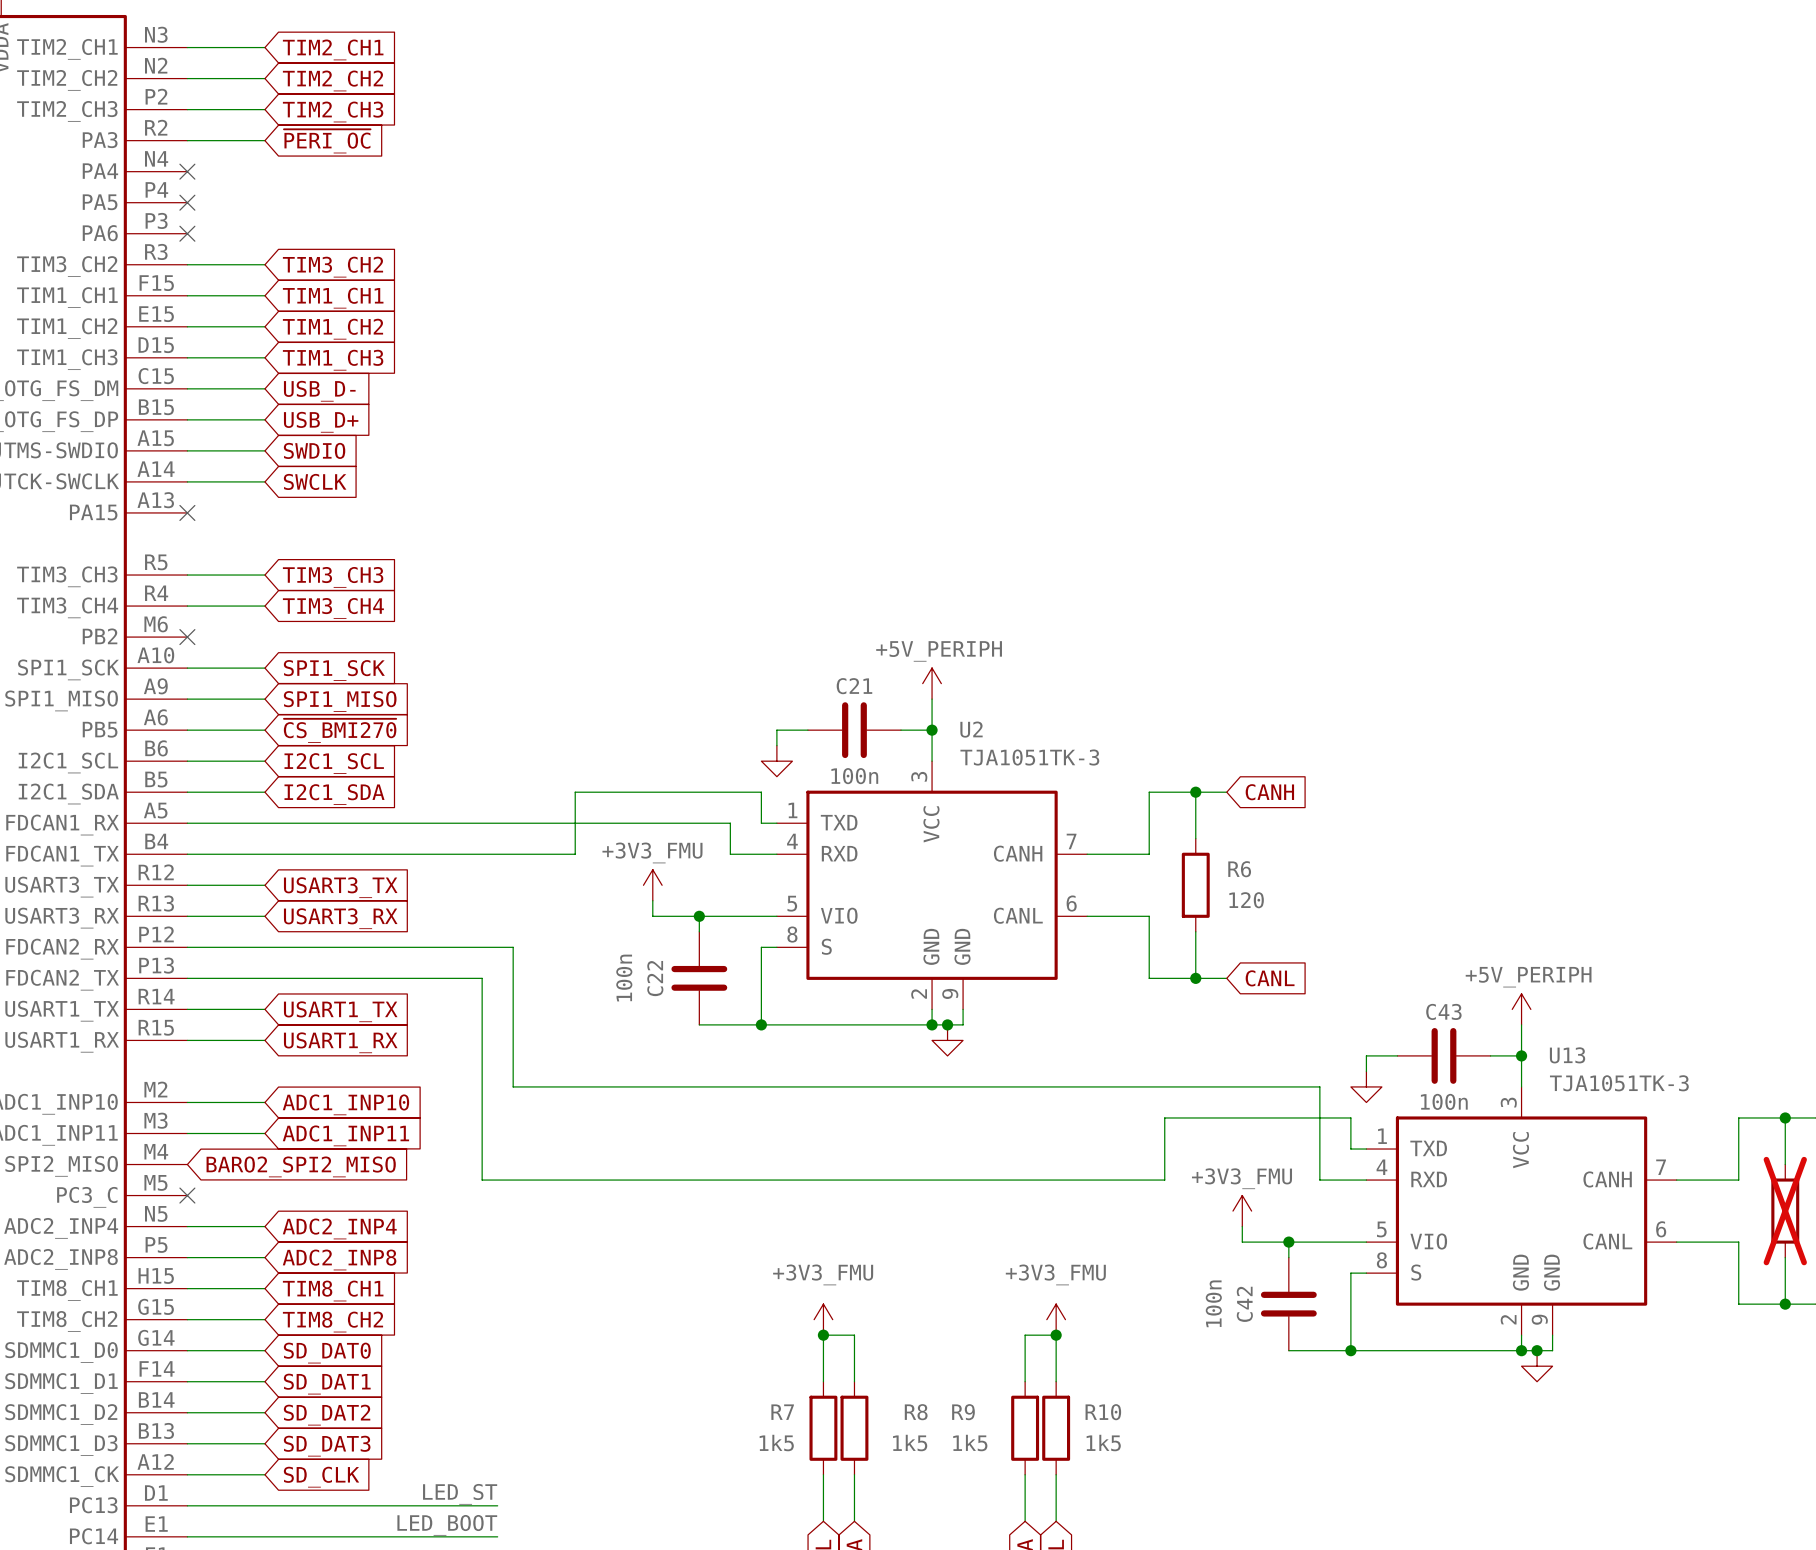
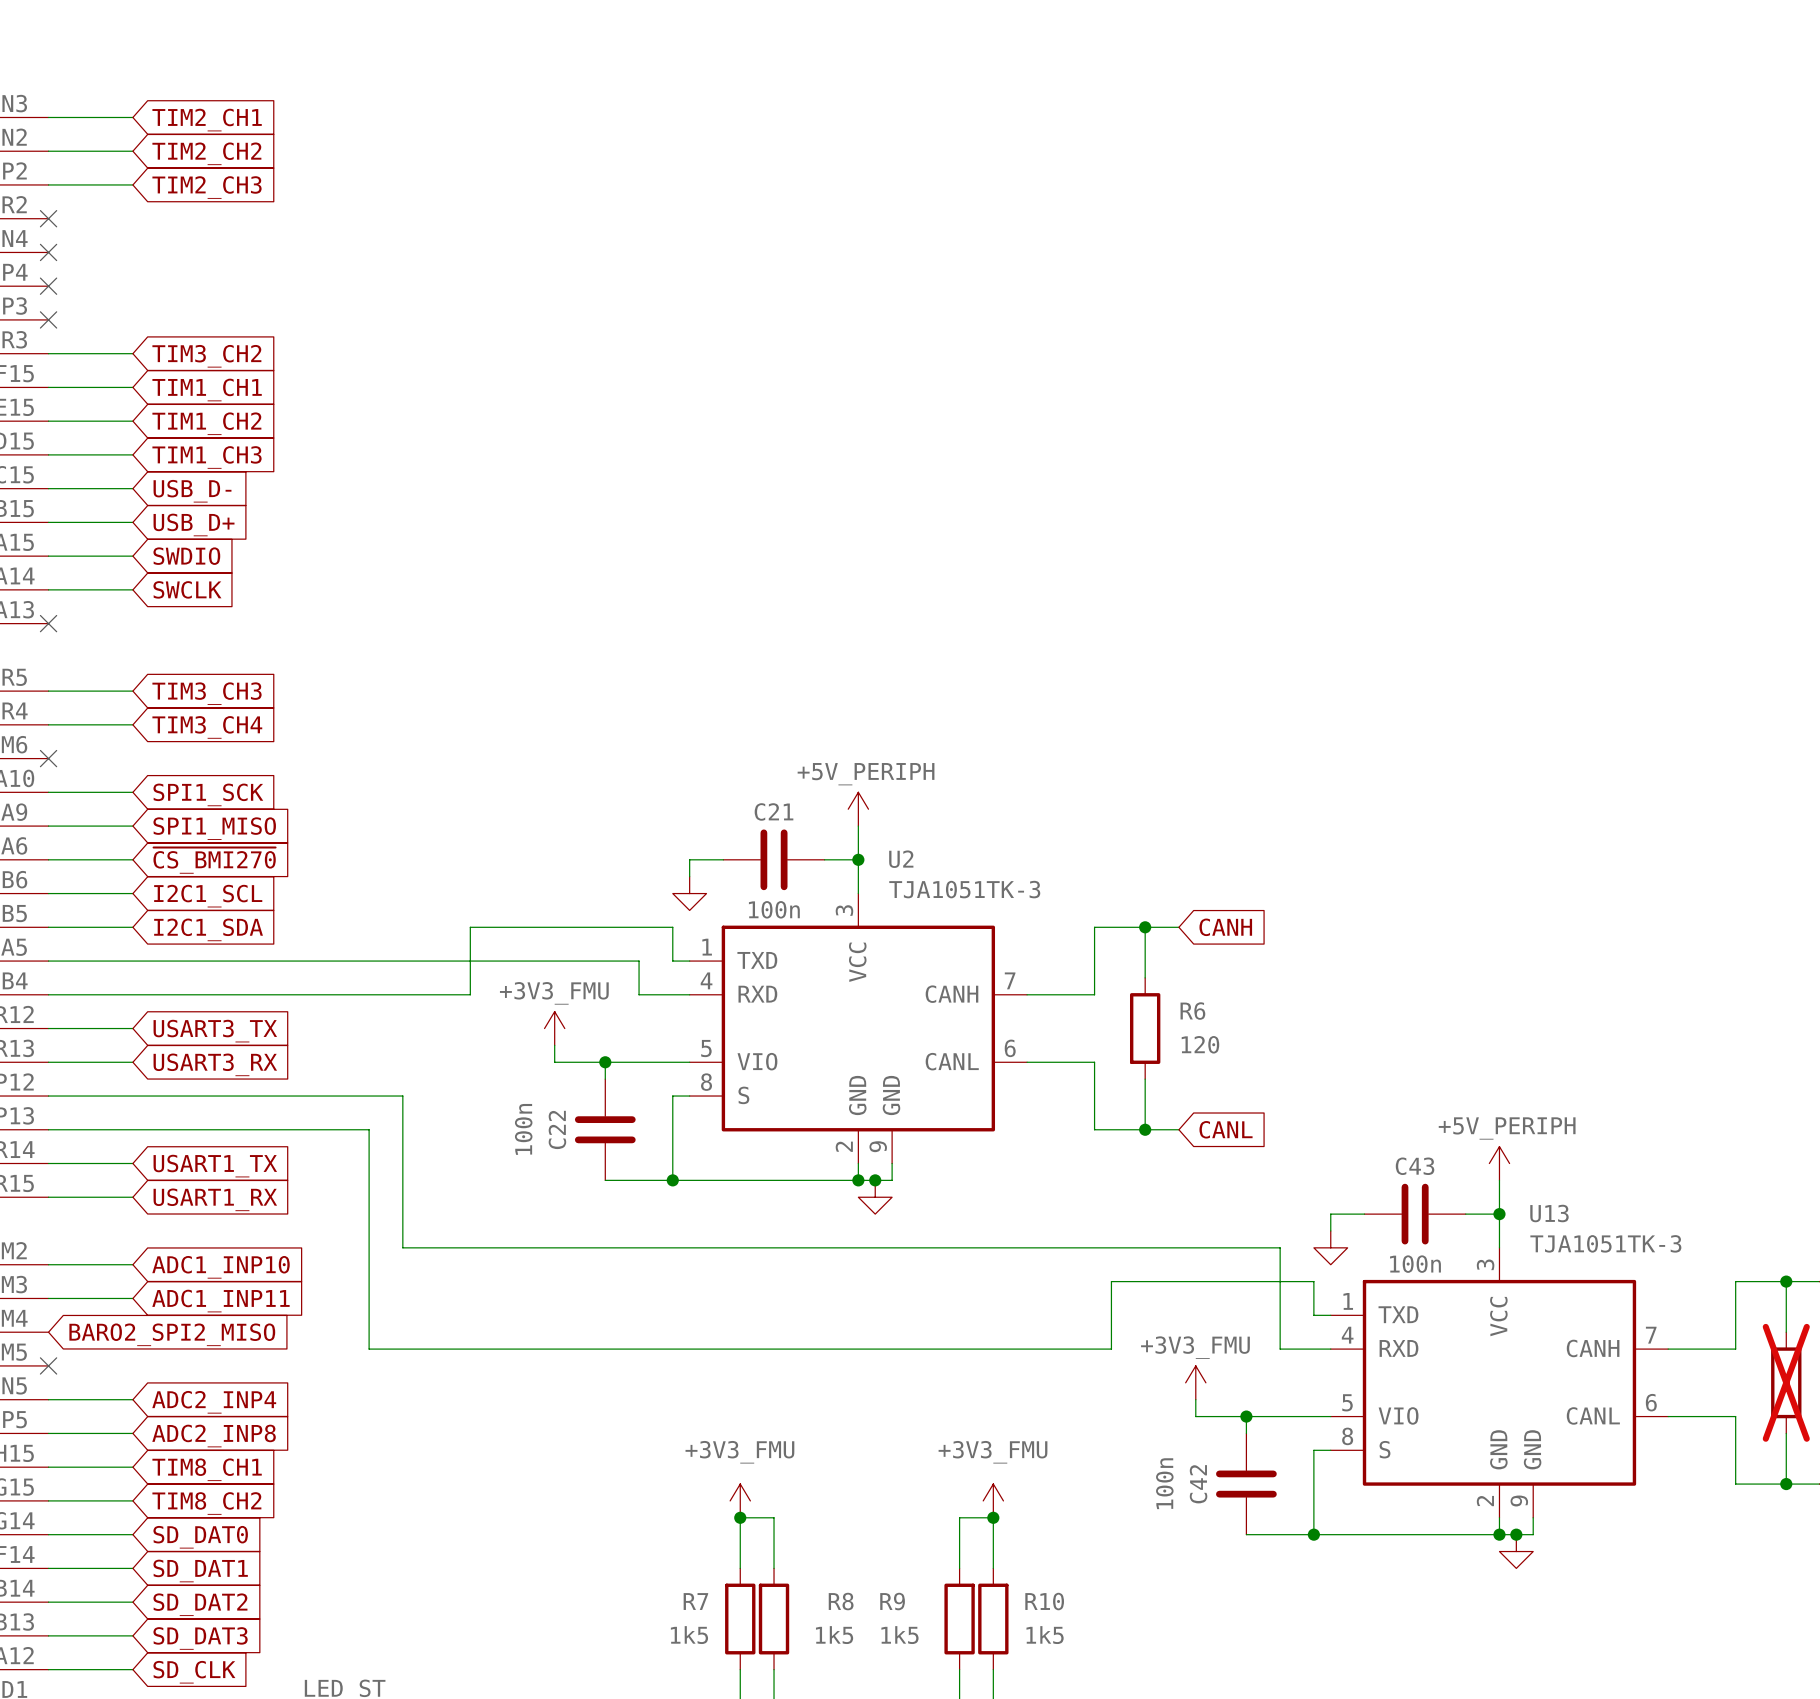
wire: (187, 140) (264, 140) -> none
no-connect mark: none -> (48, 218)
global label: ~{PERI_OC} (327, 141) -> none

